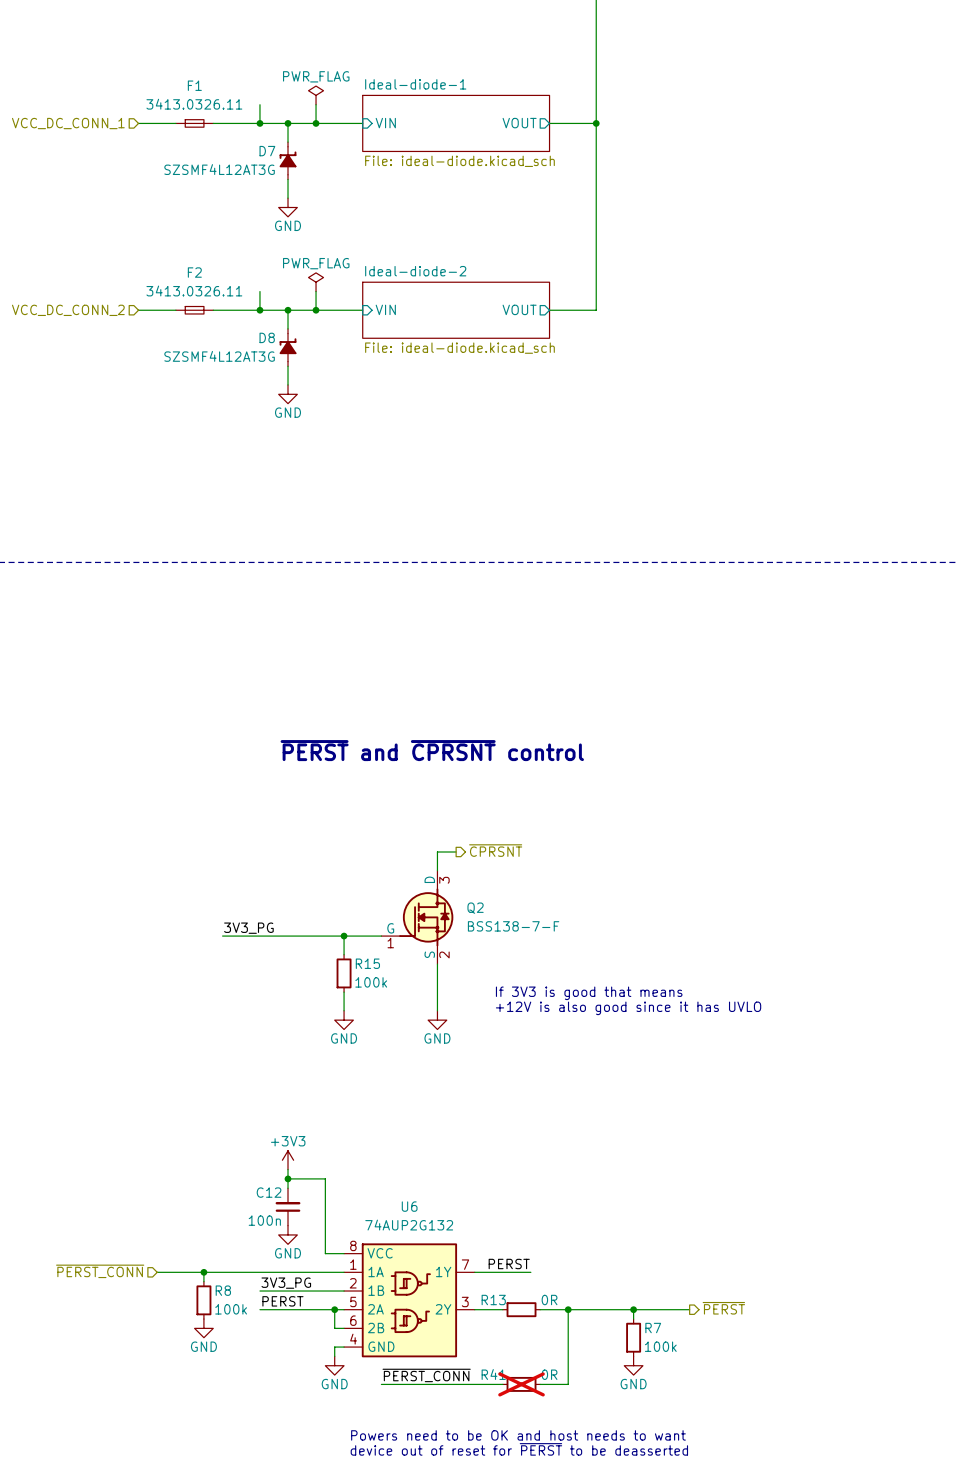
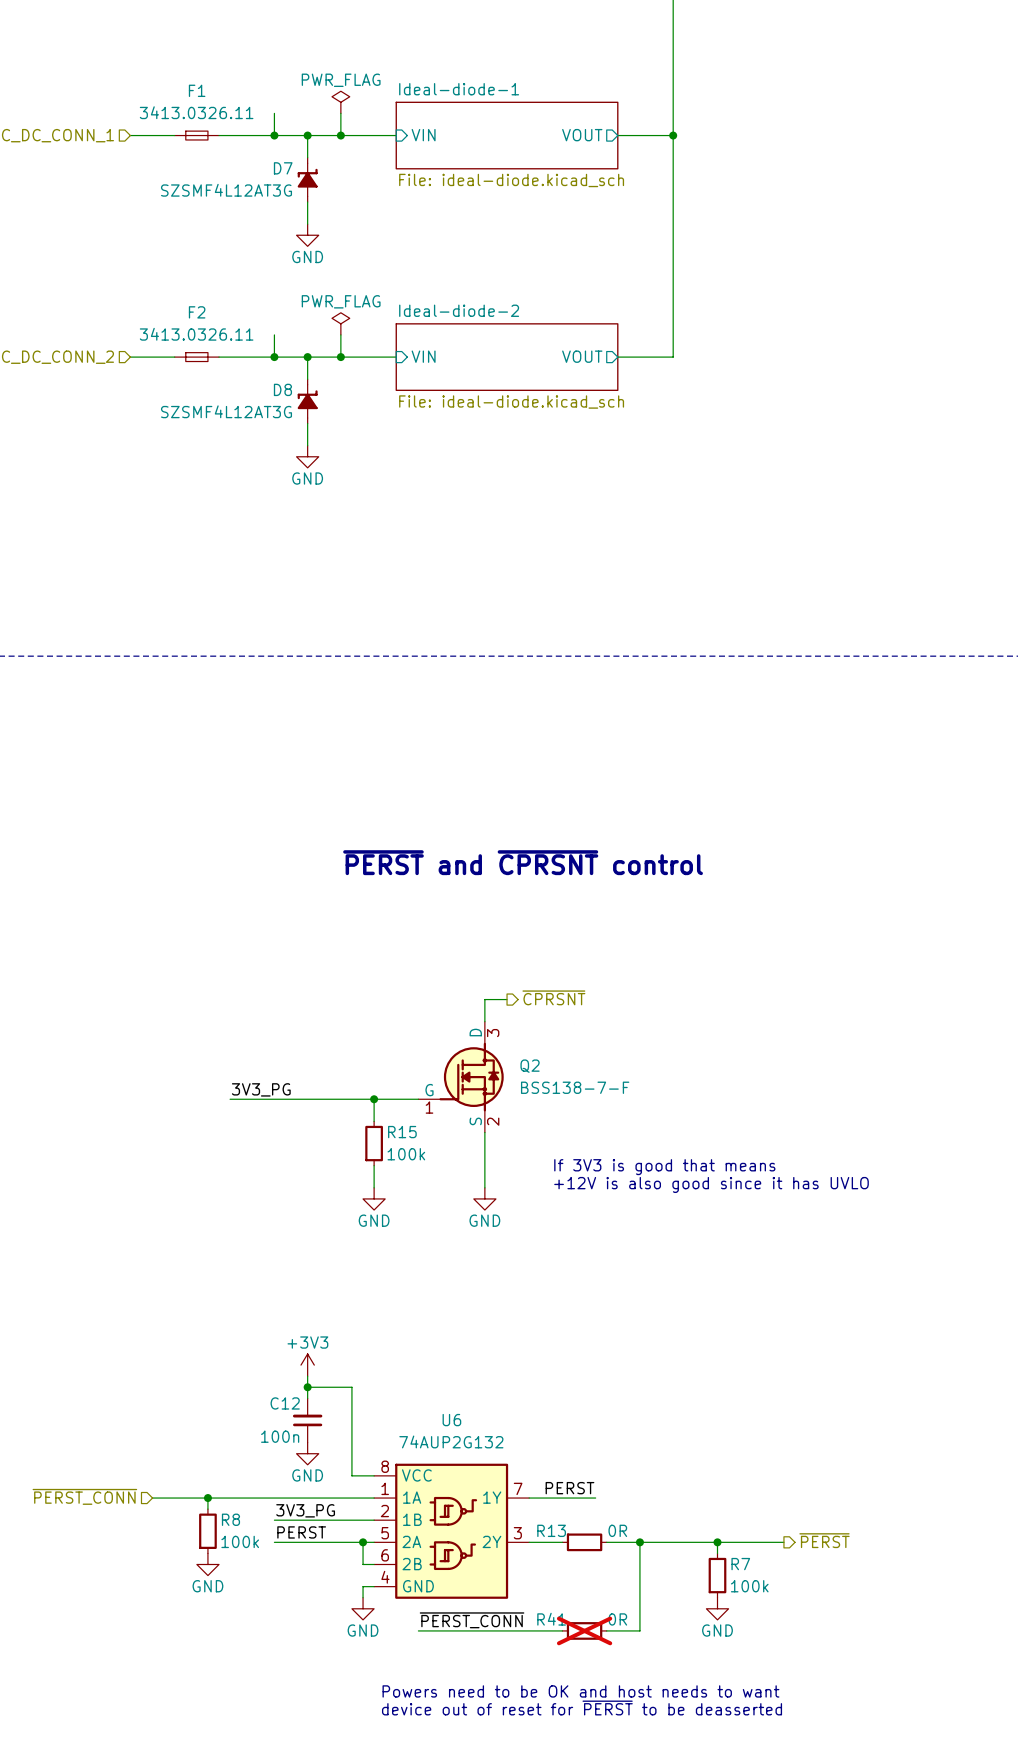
text position: ~{PERST} and ~{CPRSNT} control (432, 750) -> ~{PERST} and ~{CPRSNT} control (523, 862)

